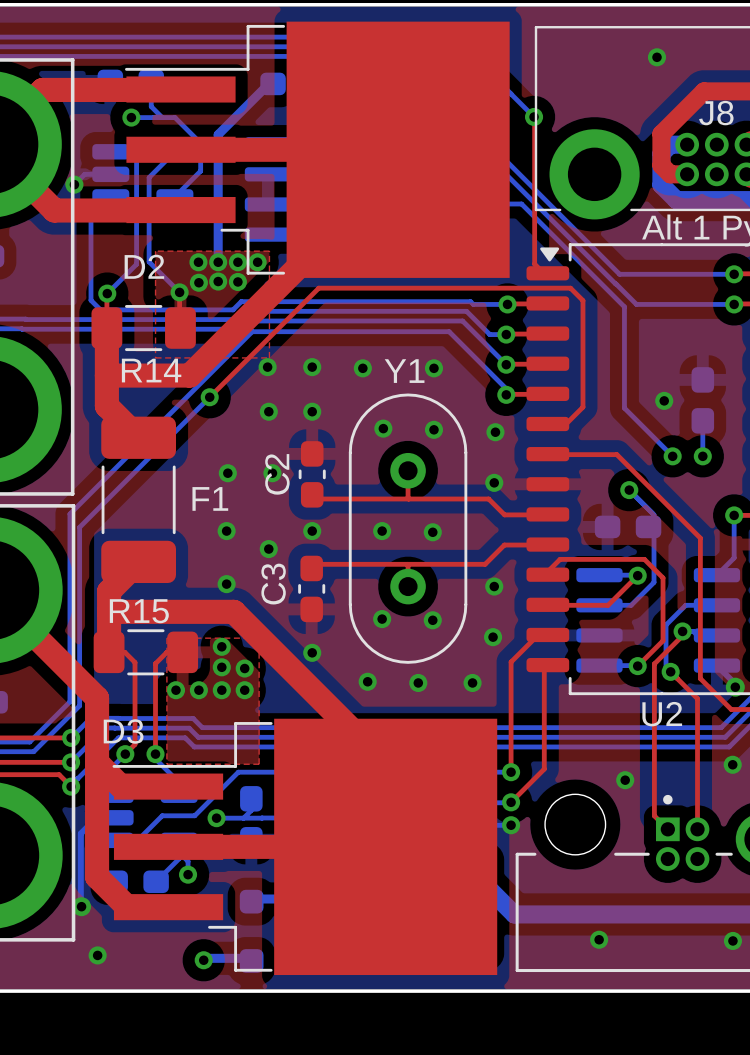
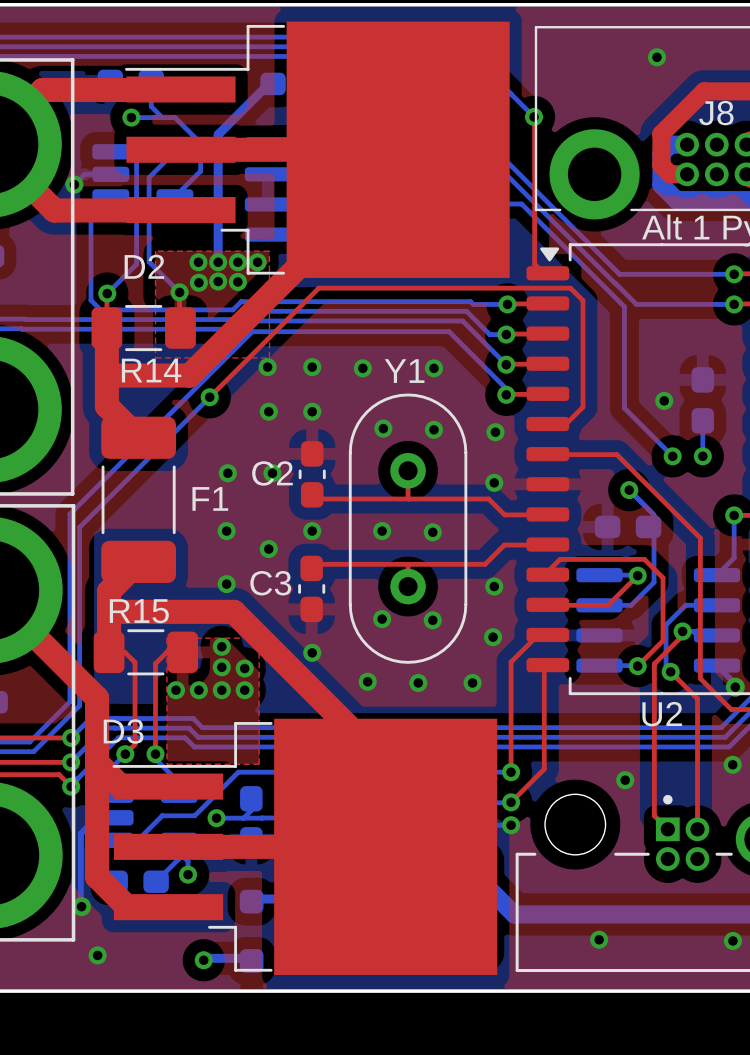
C2 name rotation: 0° (277, 474) -> 90° clockwise (272, 473)
C3 name rotation: 0° (273, 584) -> 90° clockwise (270, 583)

